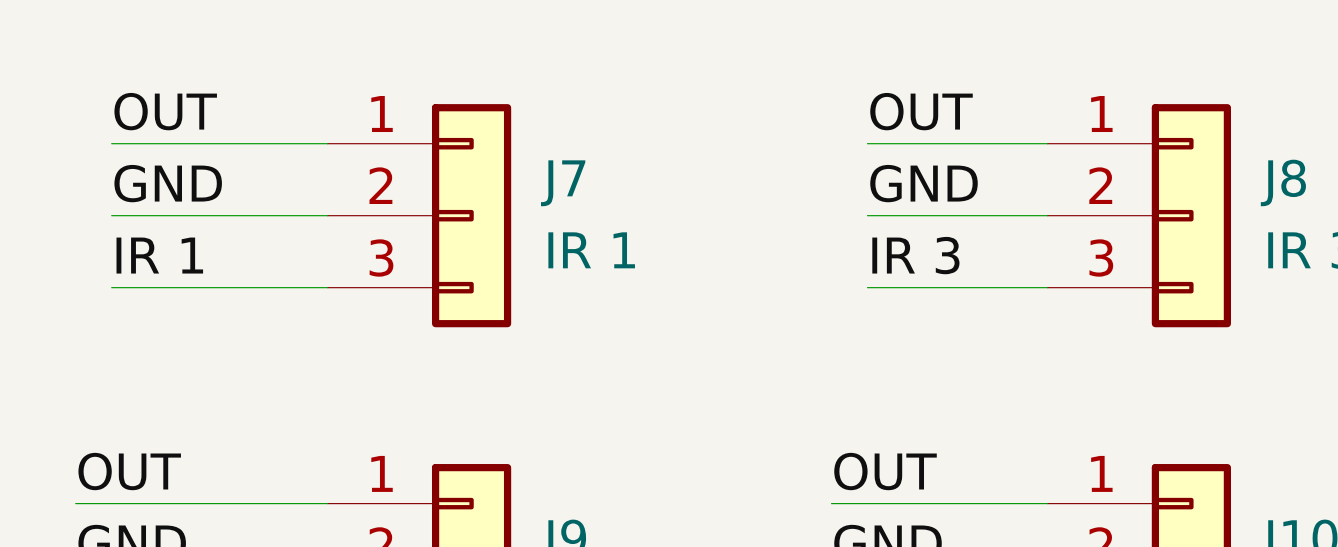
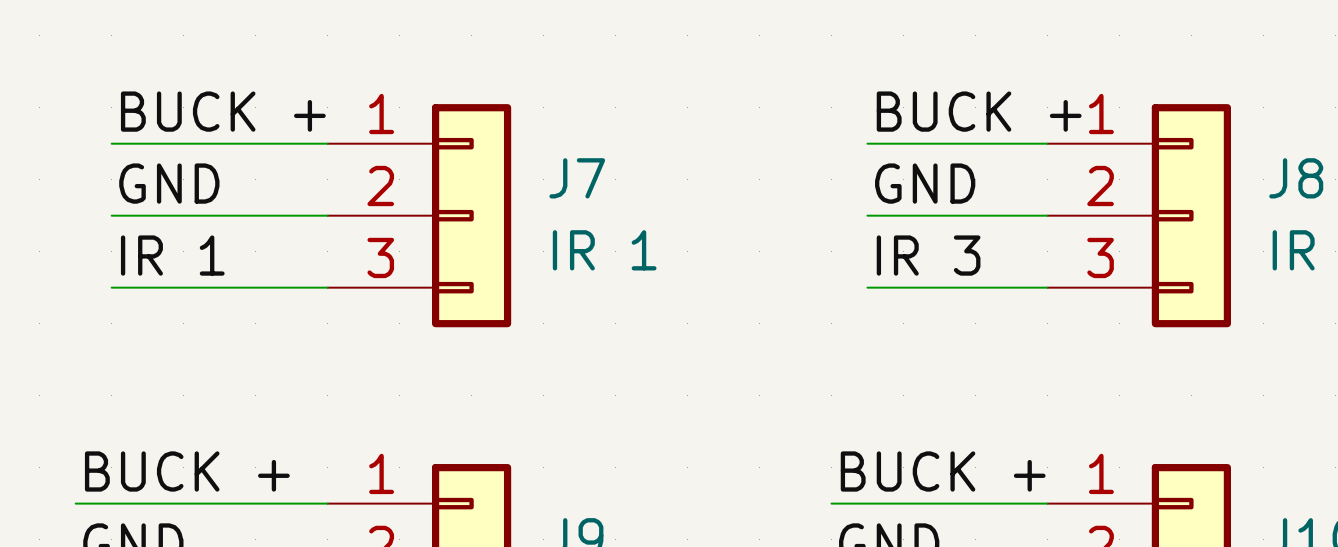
label: OUT (165, 111) -> BUCK + (223, 111)
label: OUT (921, 111) -> BUCK + (979, 111)
label: OUT (129, 471) -> BUCK + (187, 471)
label: OUT (885, 471) -> BUCK + (943, 471)

